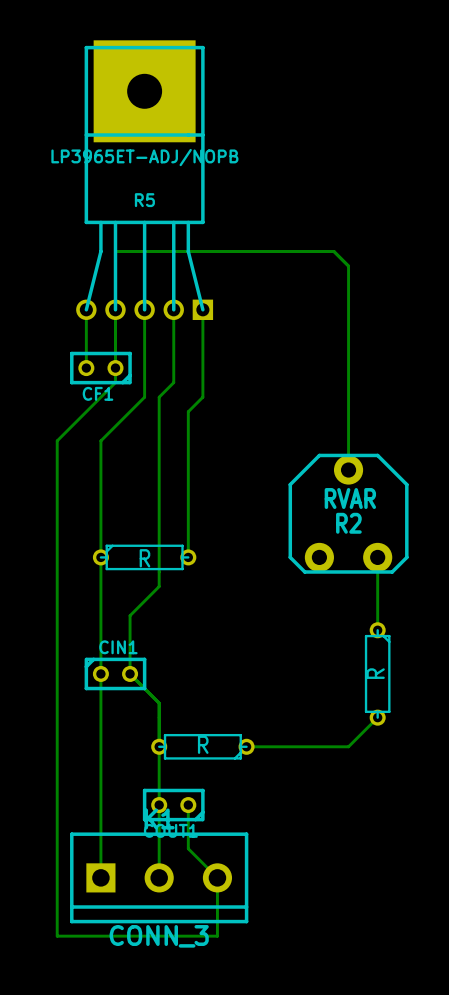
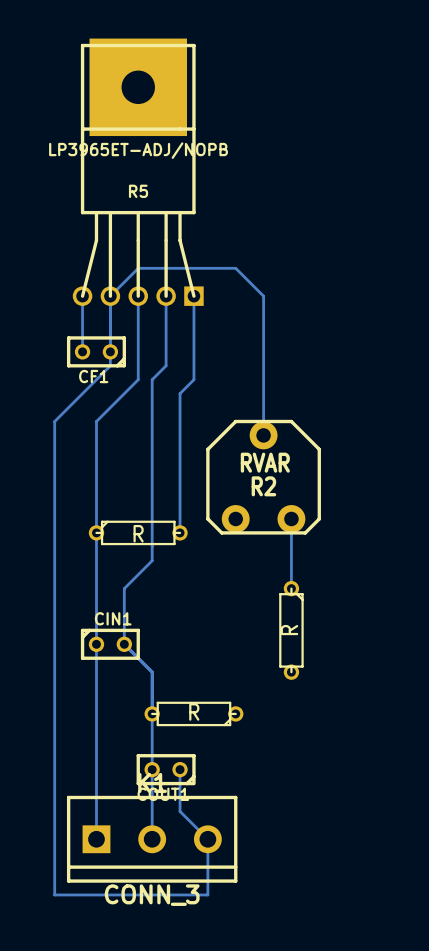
bottom track: (115, 251) (333, 251) (348, 266) (348, 470) -> none
bottom track: none -> (110, 296) (138, 268) (235, 268) (263, 296) (263, 435)
R2 position: (348, 513) -> (263, 477)
bottom track: (377, 557) (377, 630) -> (291, 518) (291, 588)
part position: (377, 673) -> (291, 630)
bottom track: (377, 717) (348, 746) (246, 746) -> none

